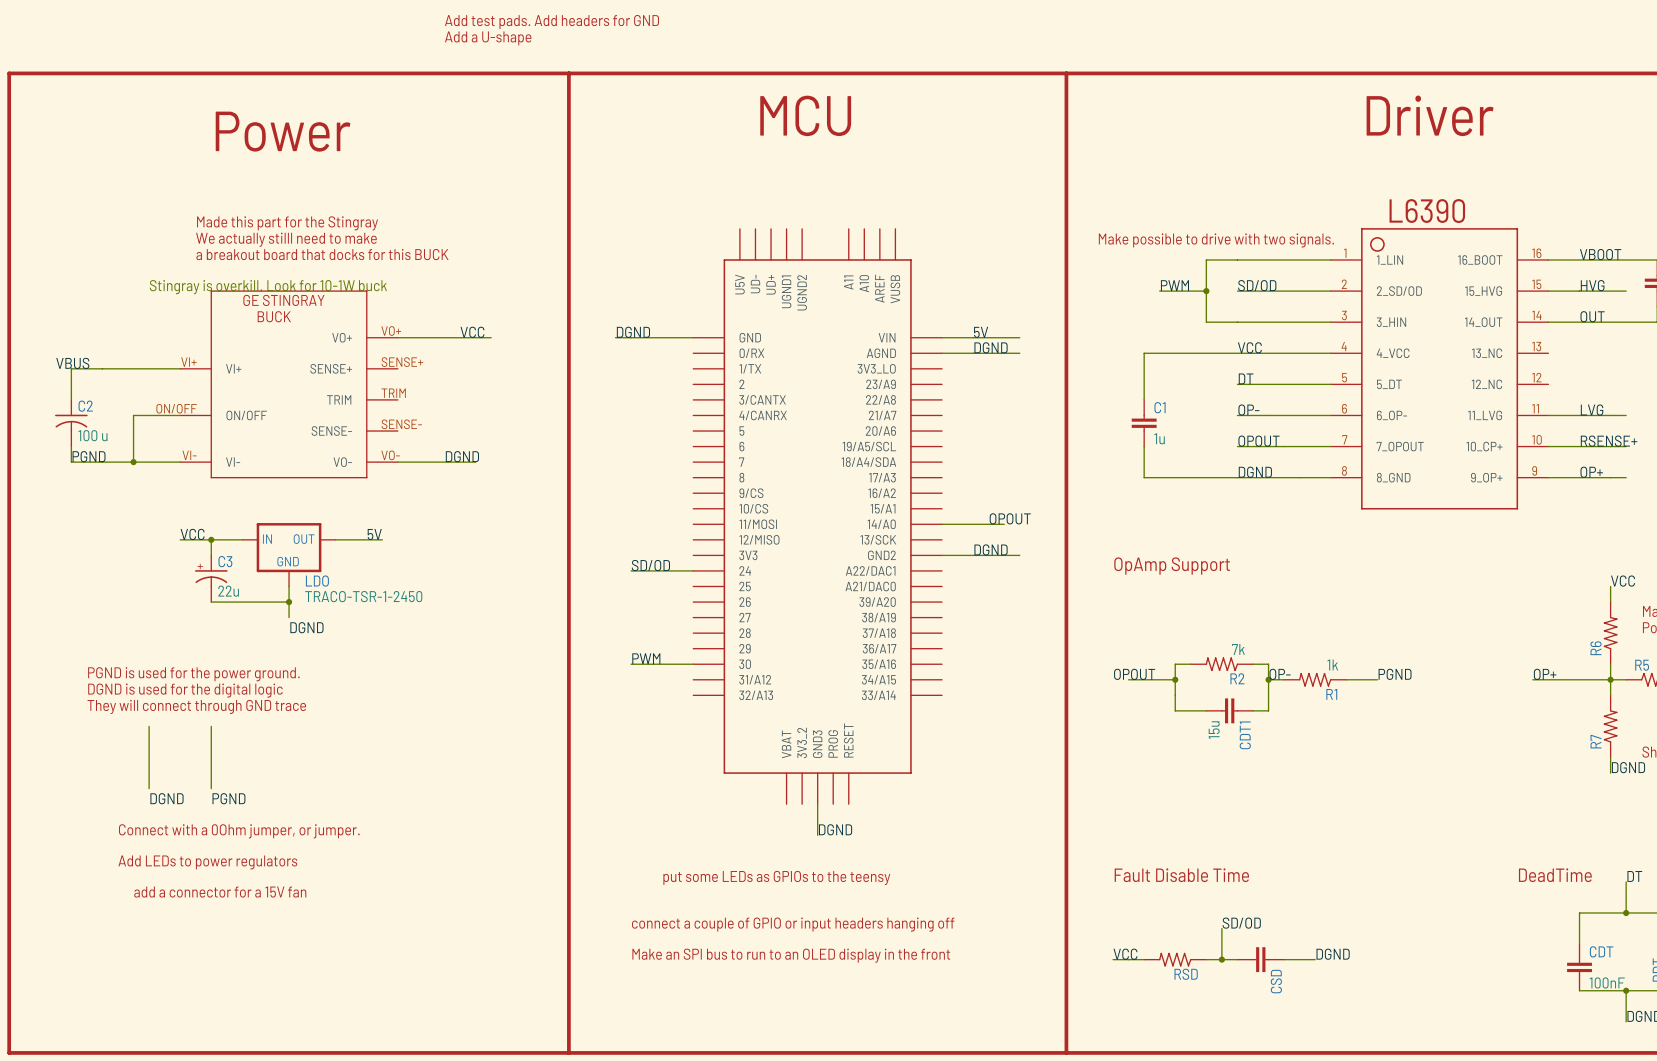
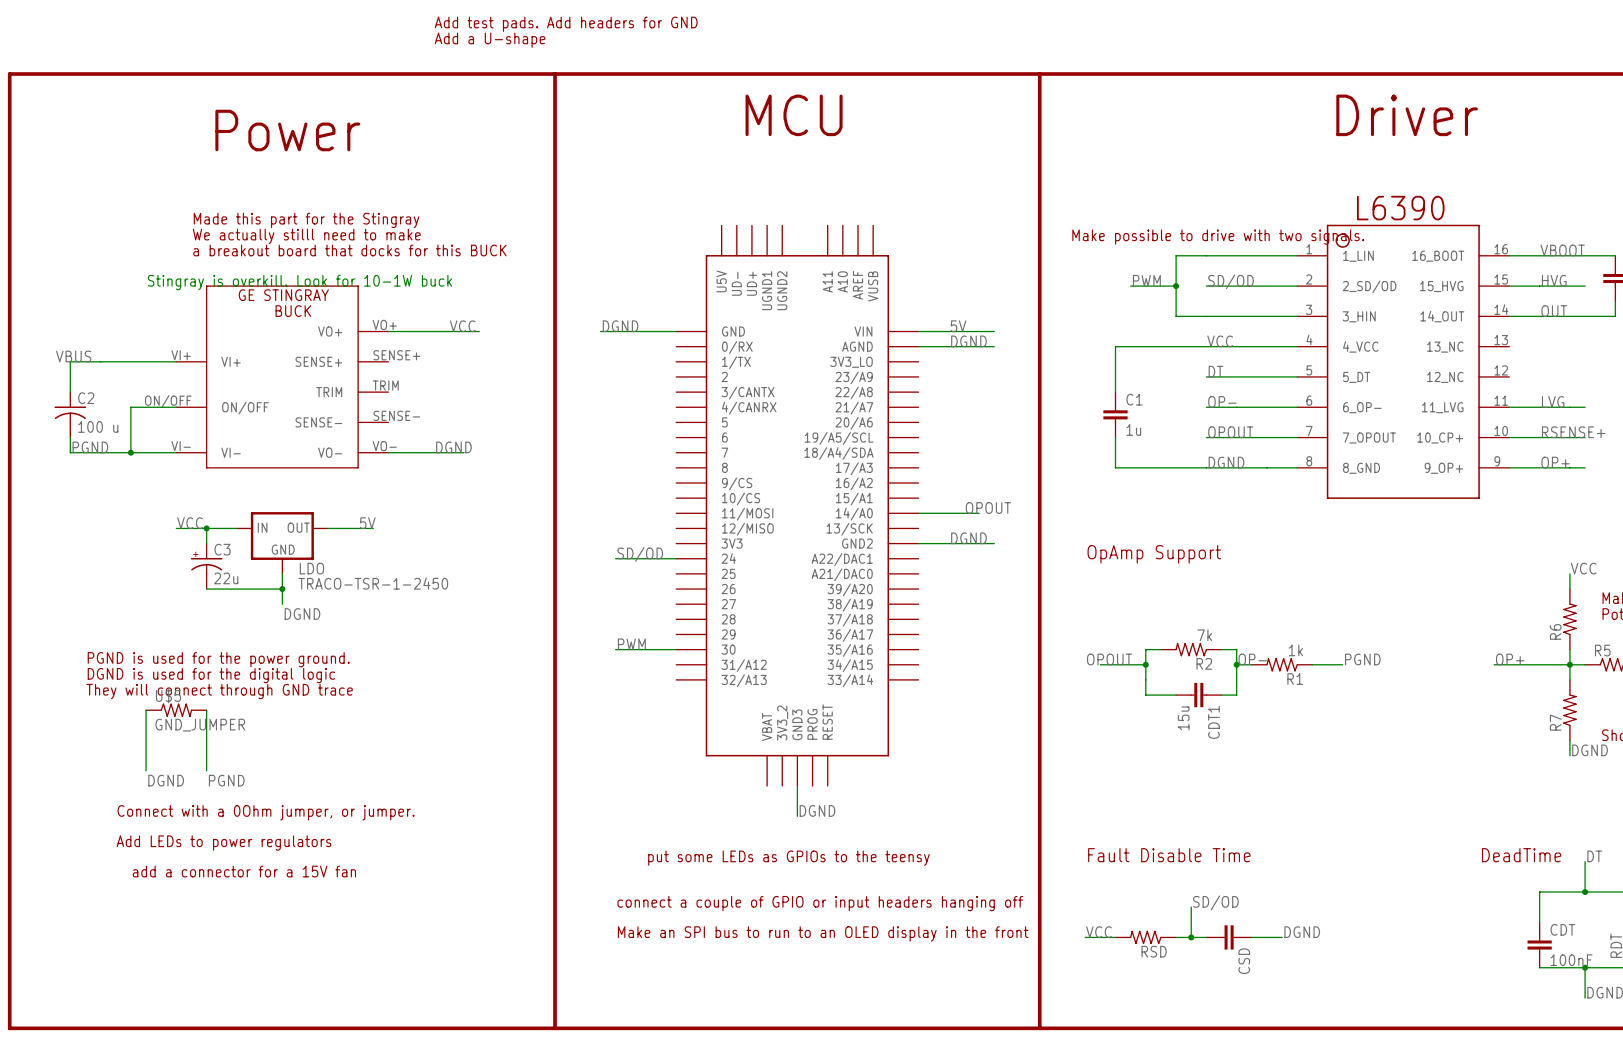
U$5: none -> GND_JUMPER (176, 710)

